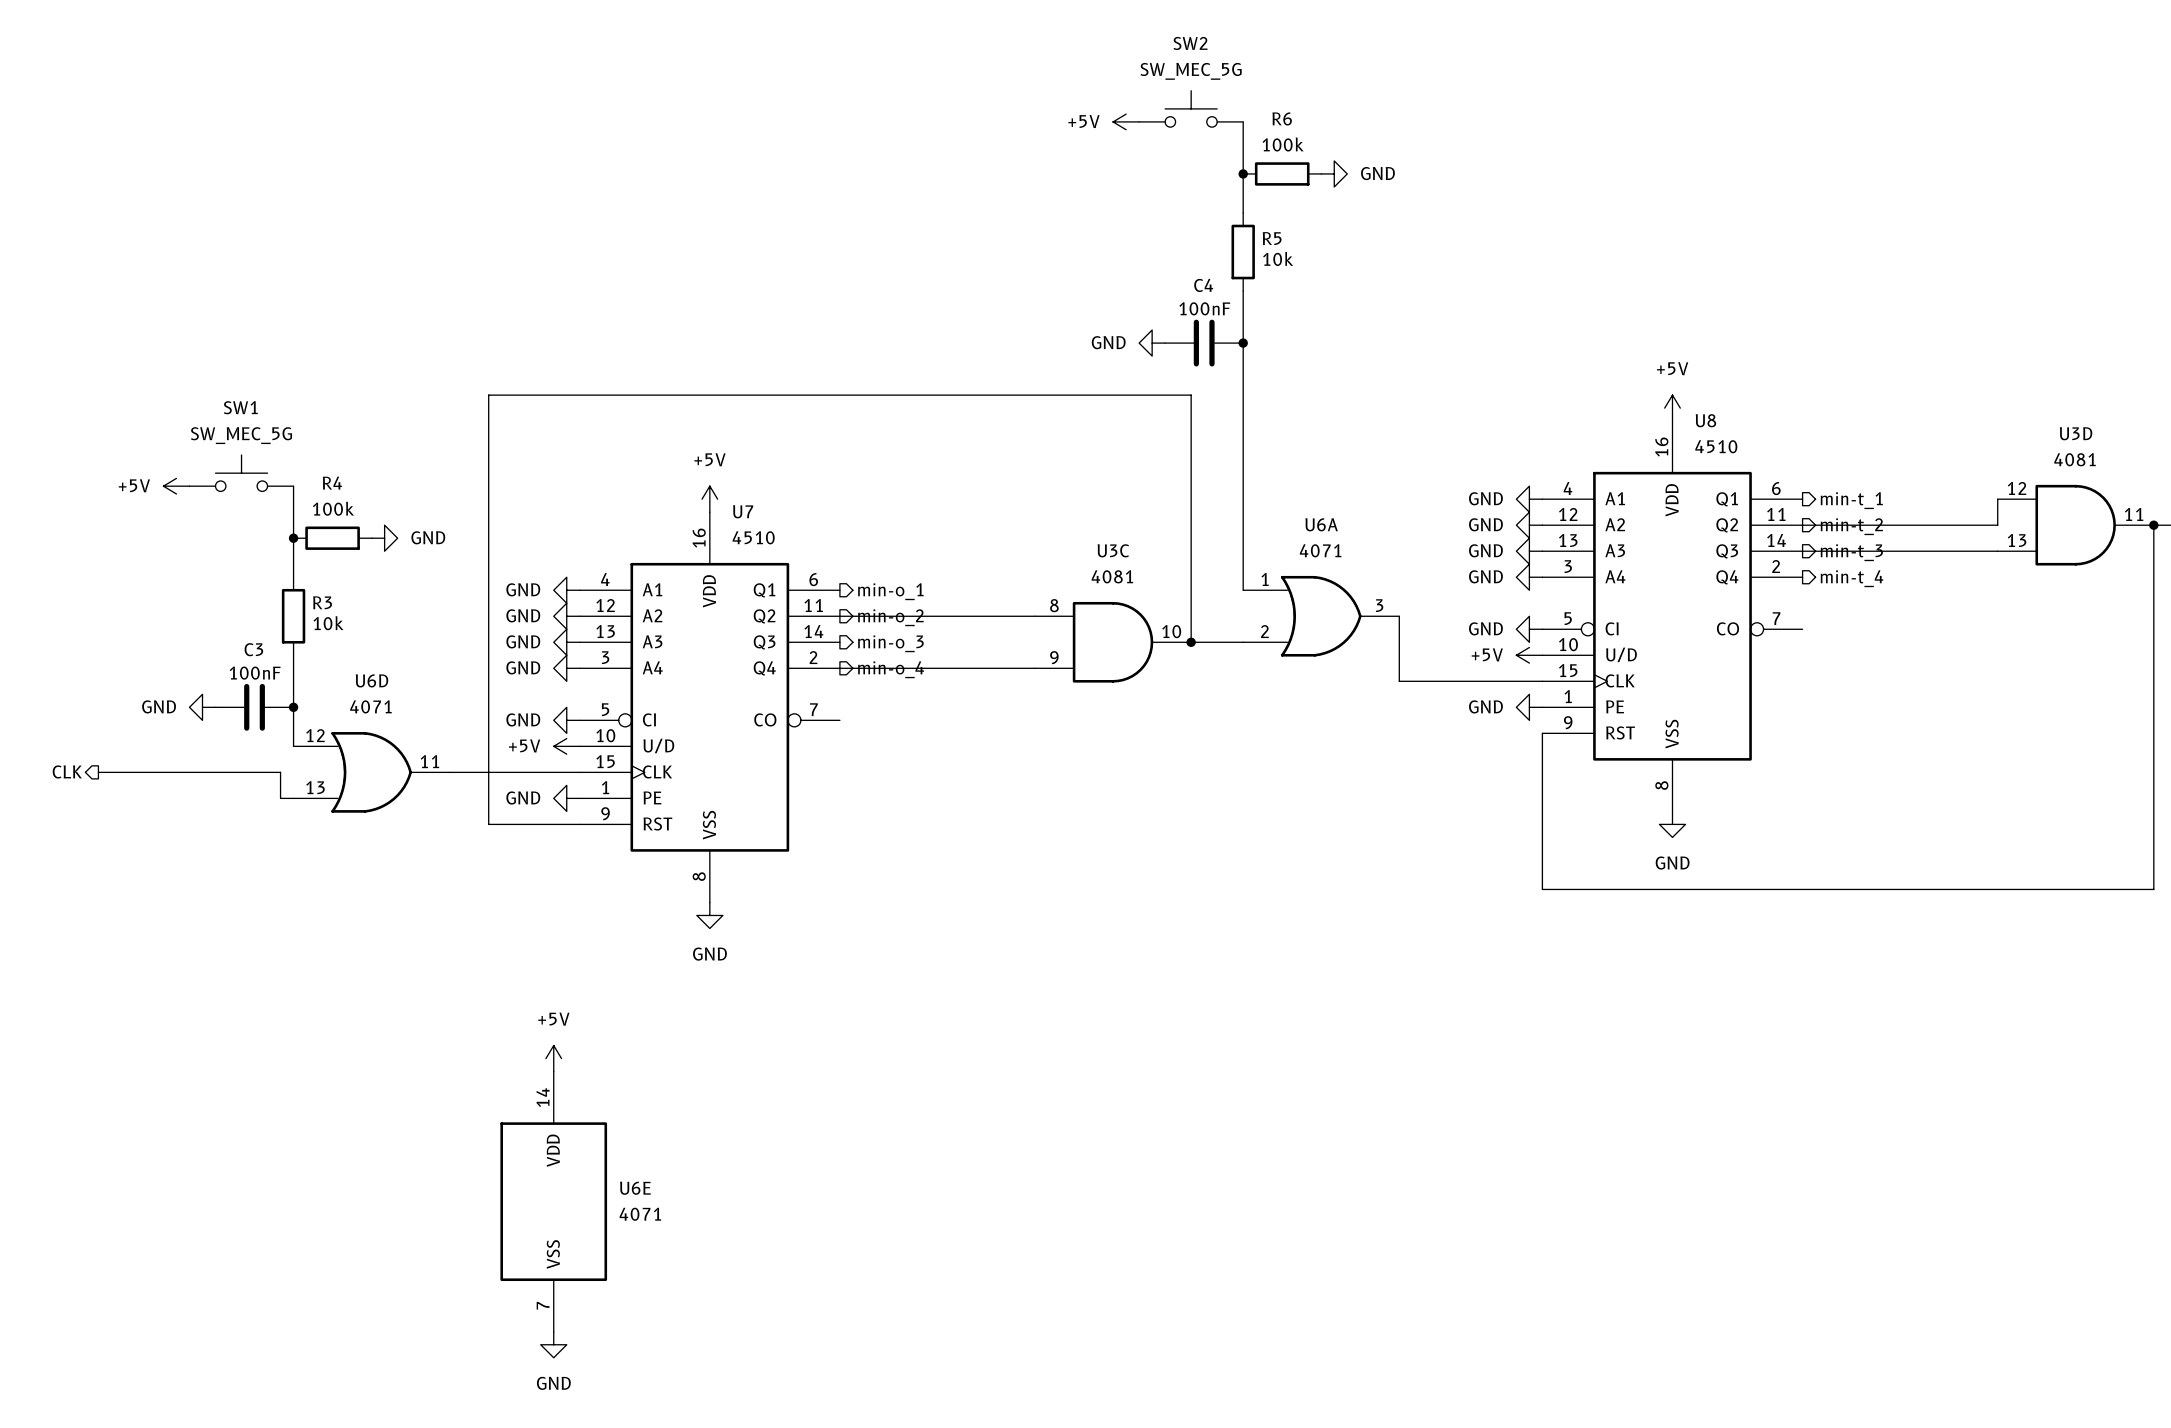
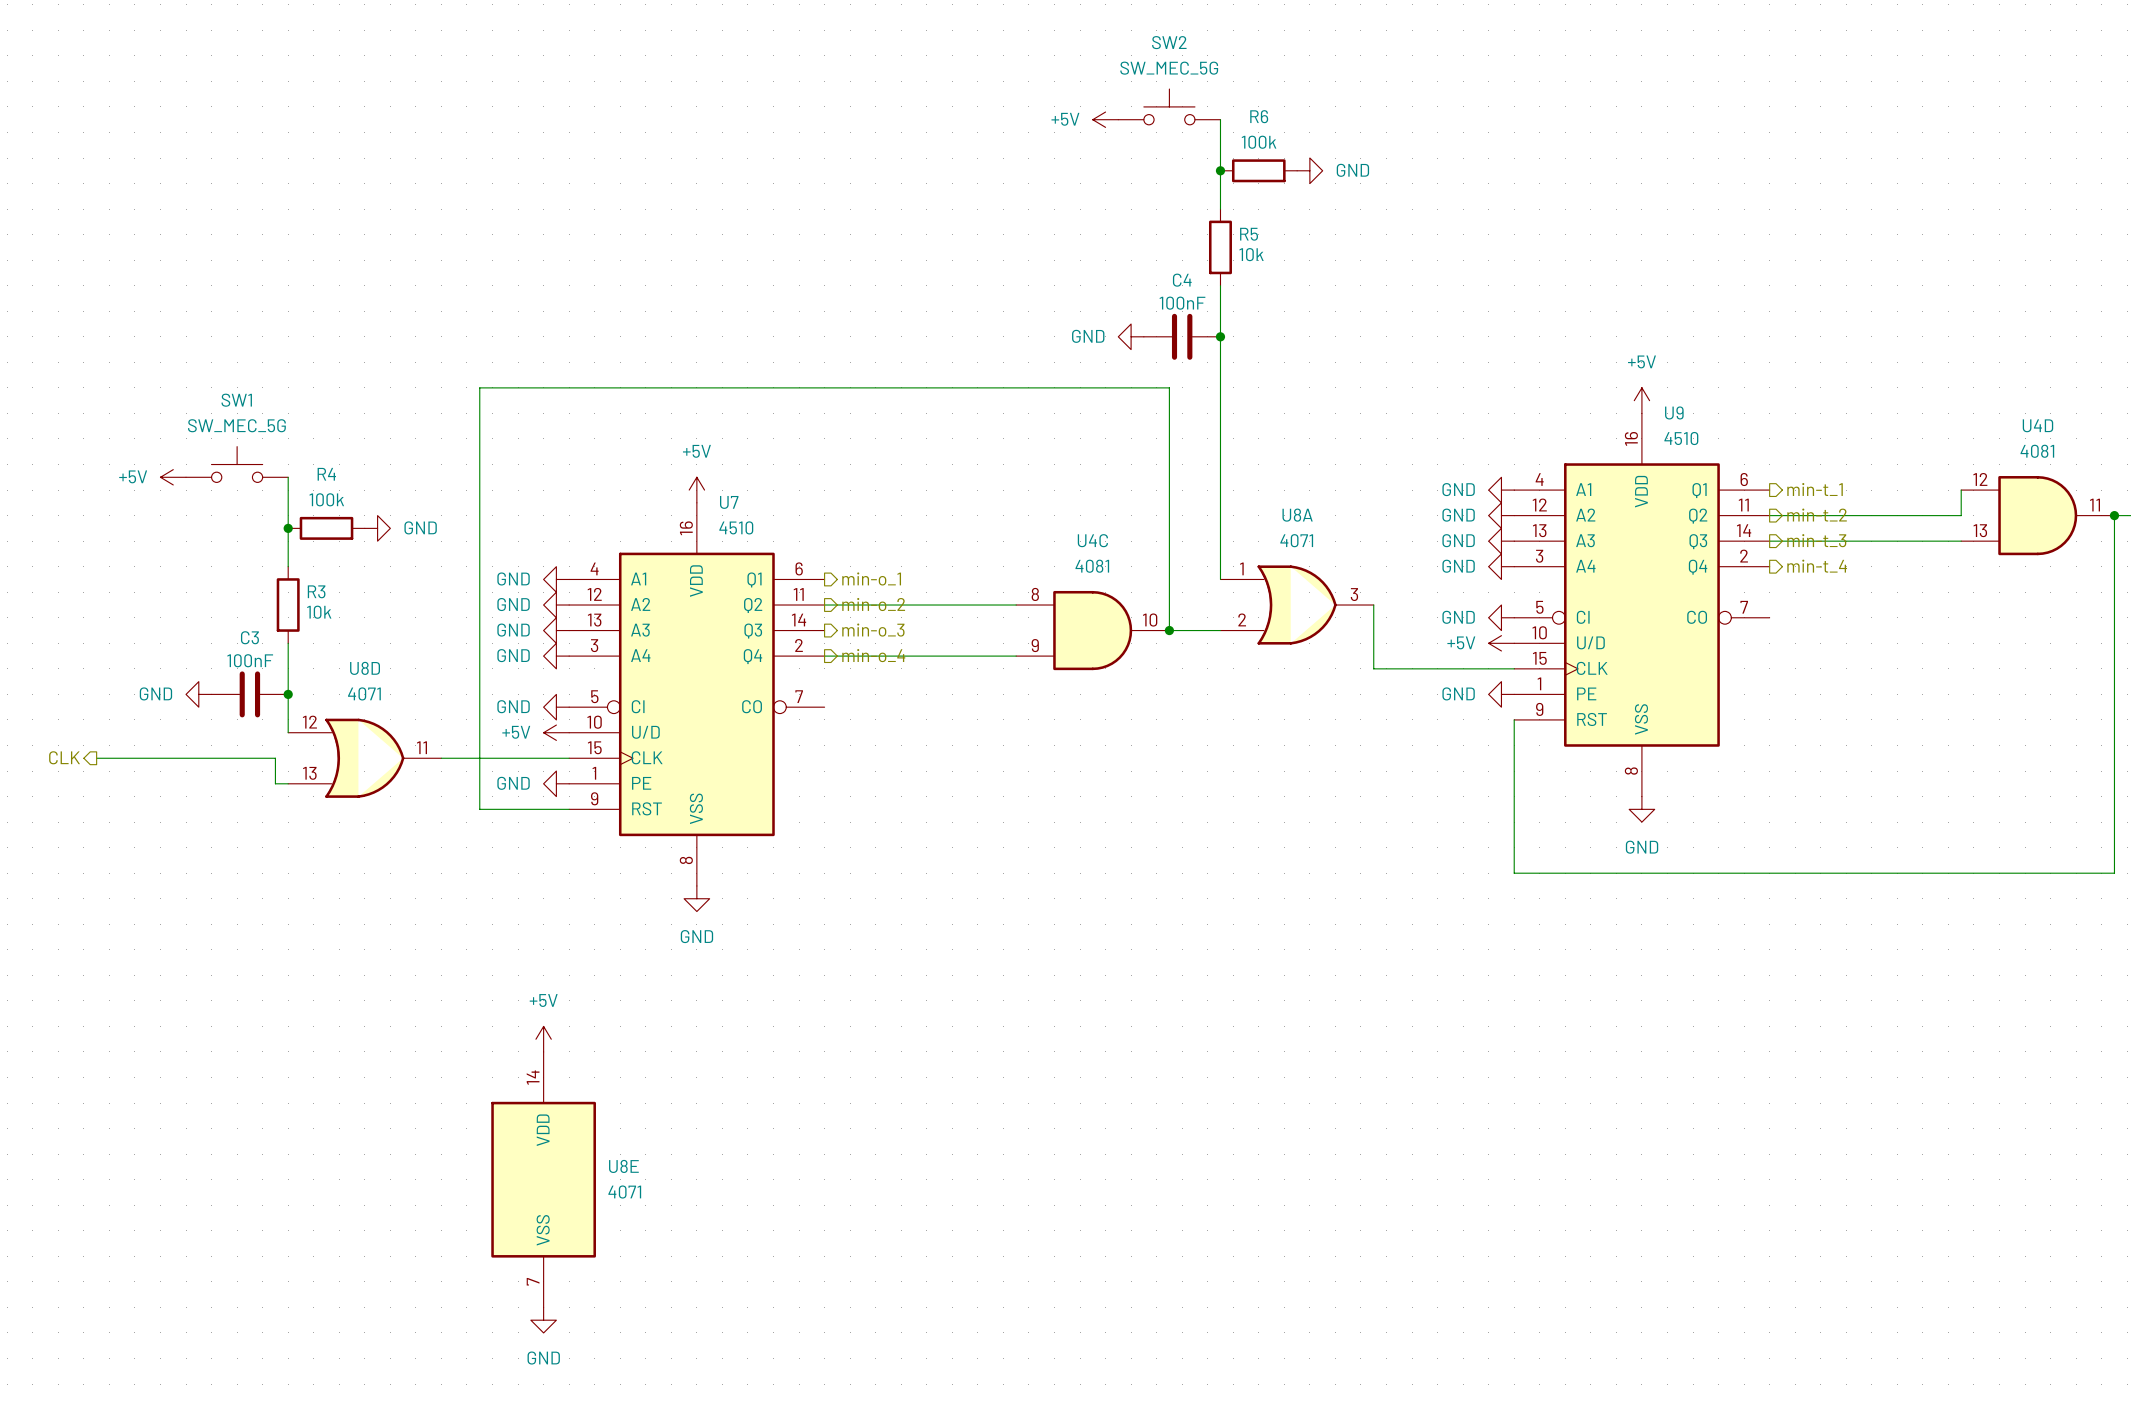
U8 name: U8 (1705, 420) -> U9 (1674, 412)
U3D name: U3D (2076, 433) -> U4D (2037, 425)
U6A name: U6A (1321, 524) -> U8A (1297, 515)
U3C name: U3C (1113, 550) -> U4C (1092, 540)
U6D name: U6D (372, 680) -> U8D (365, 668)
U6E name: U6E (635, 1188) -> U8E (623, 1166)

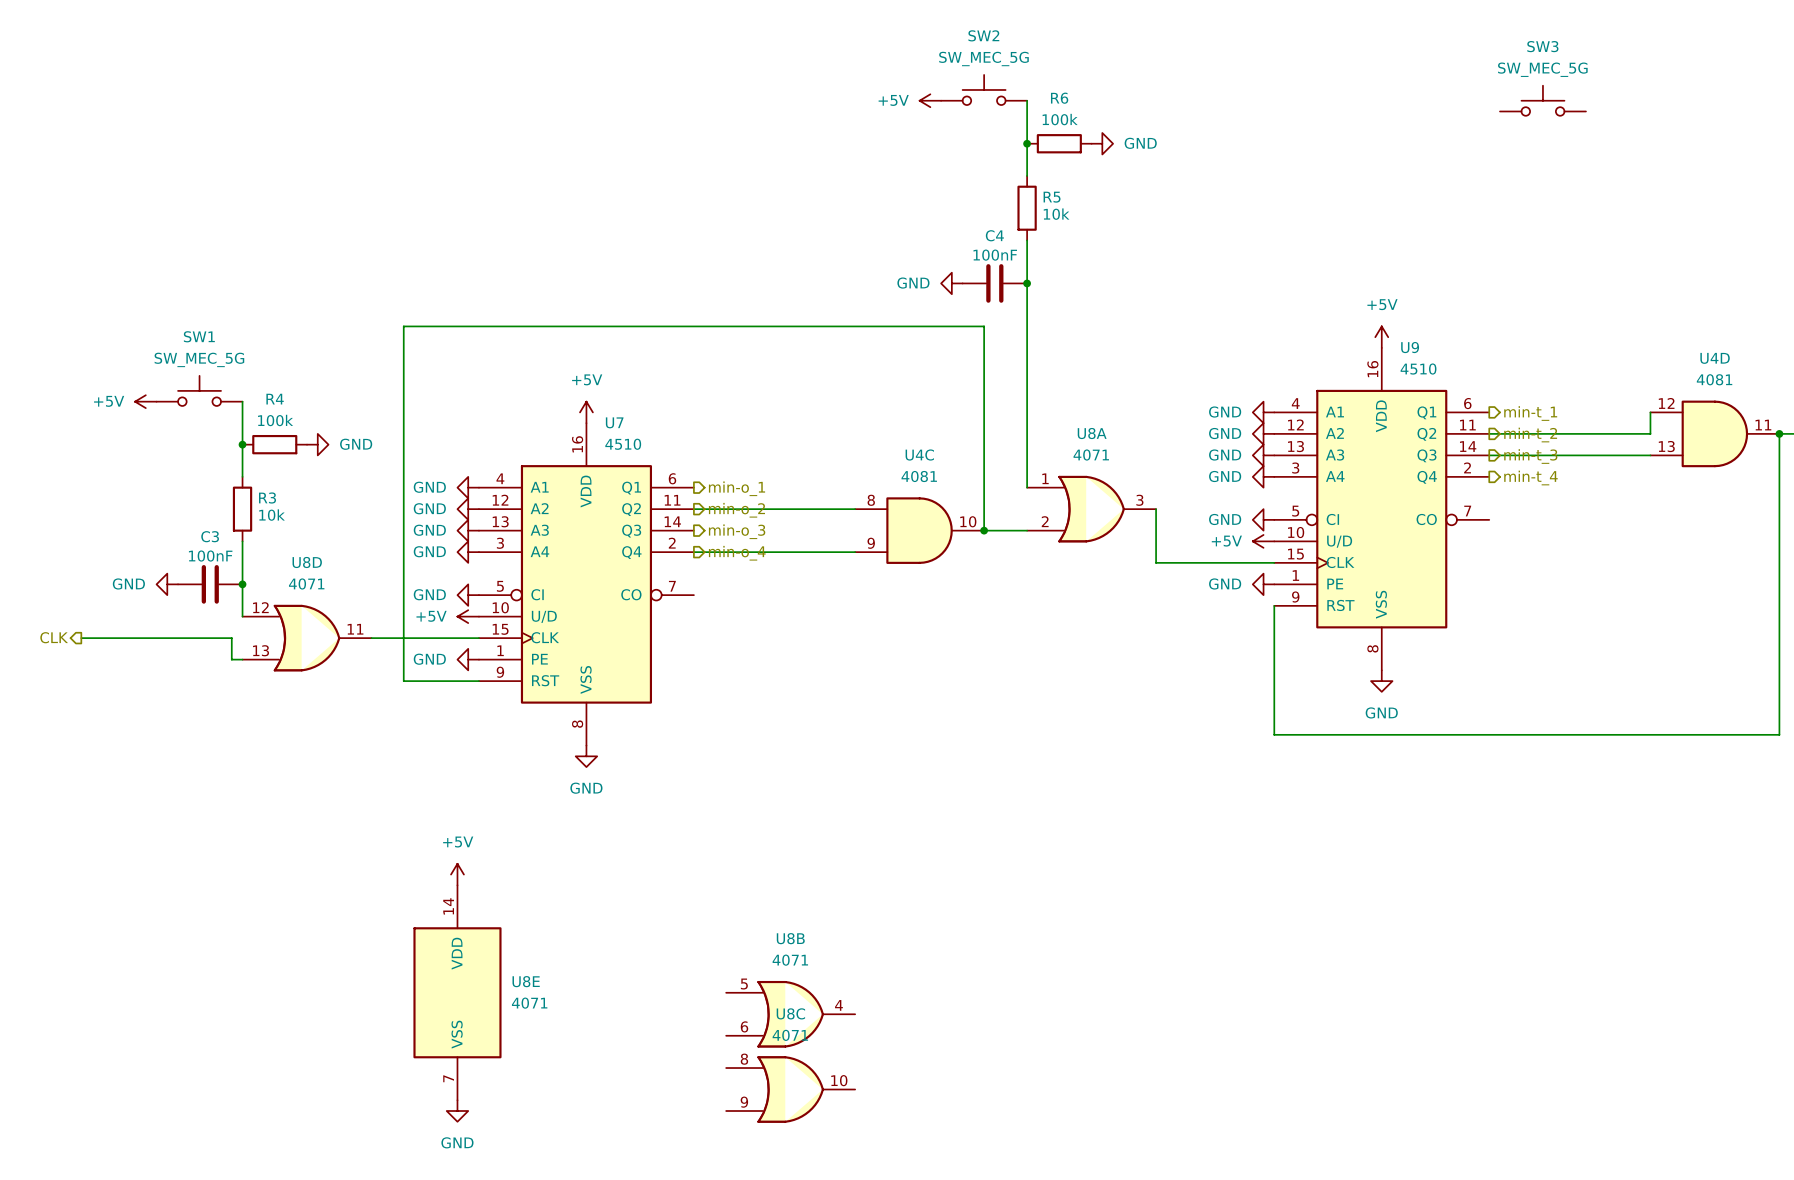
SW3: none -> SW_MEC_5G (1542, 100)
U8B: none -> 4071 (790, 1014)
U8C: none -> 4071 (790, 1089)

